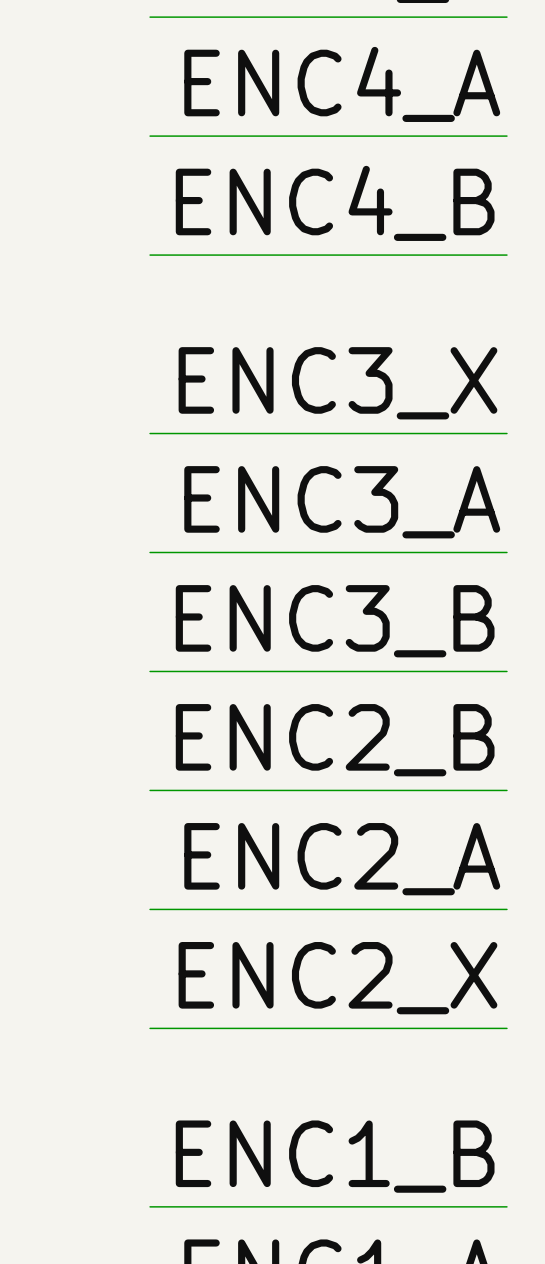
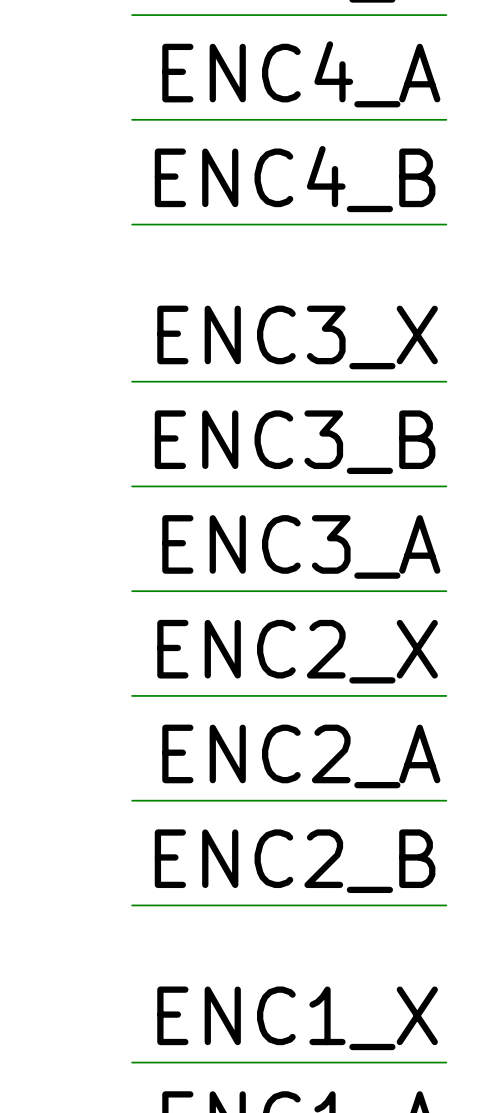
label: ENC3_A (342, 502) -> ENC3_B (295, 442)
label: ENC3_B (335, 621) -> ENC3_A (301, 546)
label: ENC2_B (335, 740) -> ENC2_X (297, 651)
label: ENC2_X (337, 978) -> ENC2_B (295, 861)
label: ENC1_B (335, 1156) -> ENC1_X (297, 1018)

